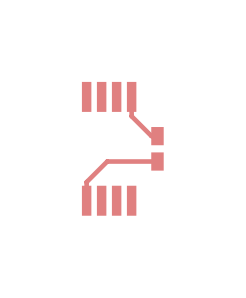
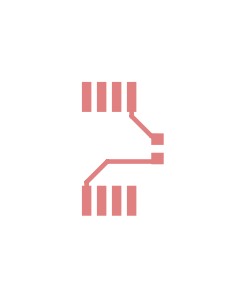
part footprint: [151, 127, 164, 171] -> [151, 133, 164, 165]

